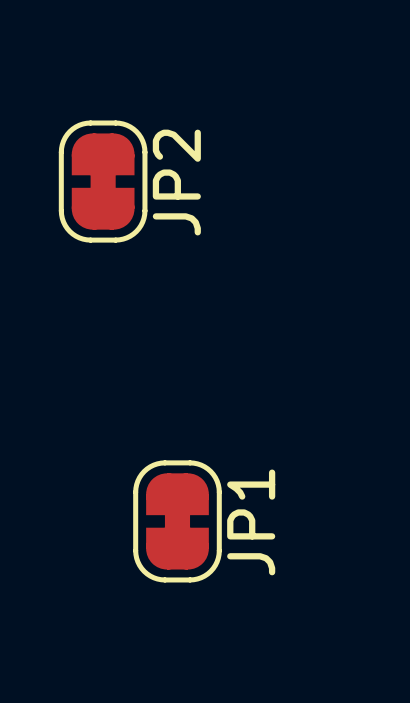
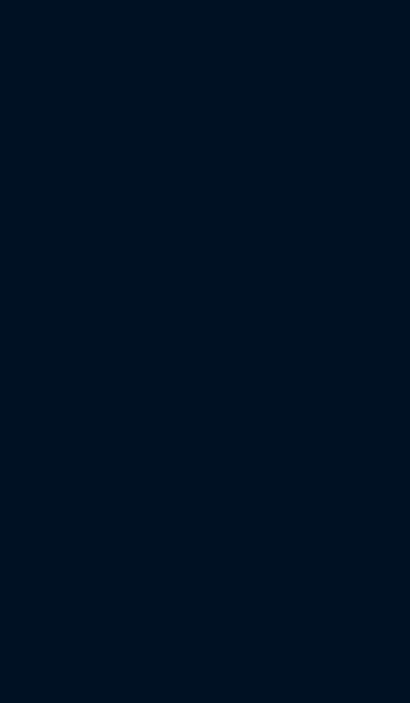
JP2: (103, 181) -> none
JP1: (177, 521) -> none

